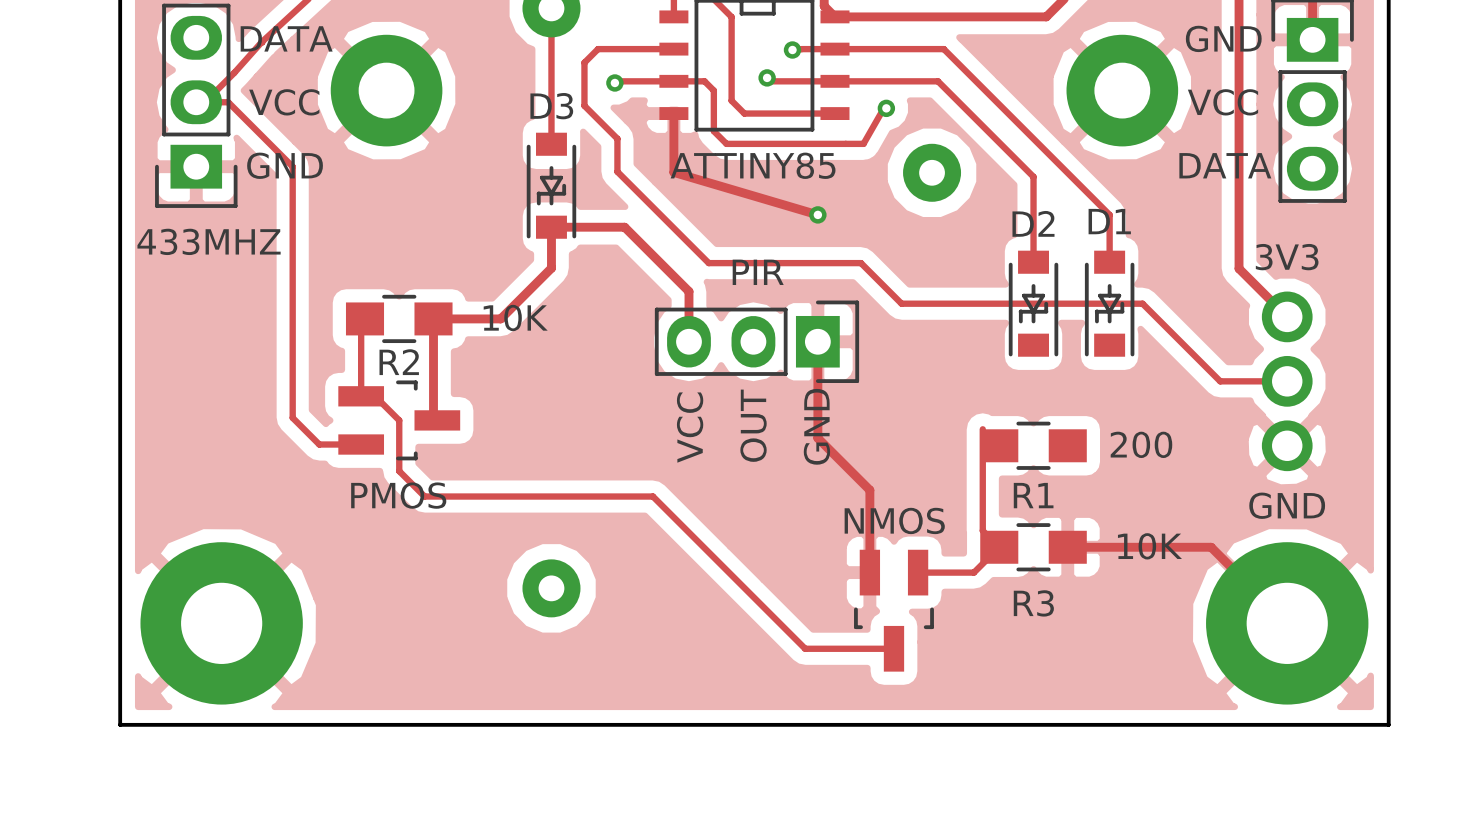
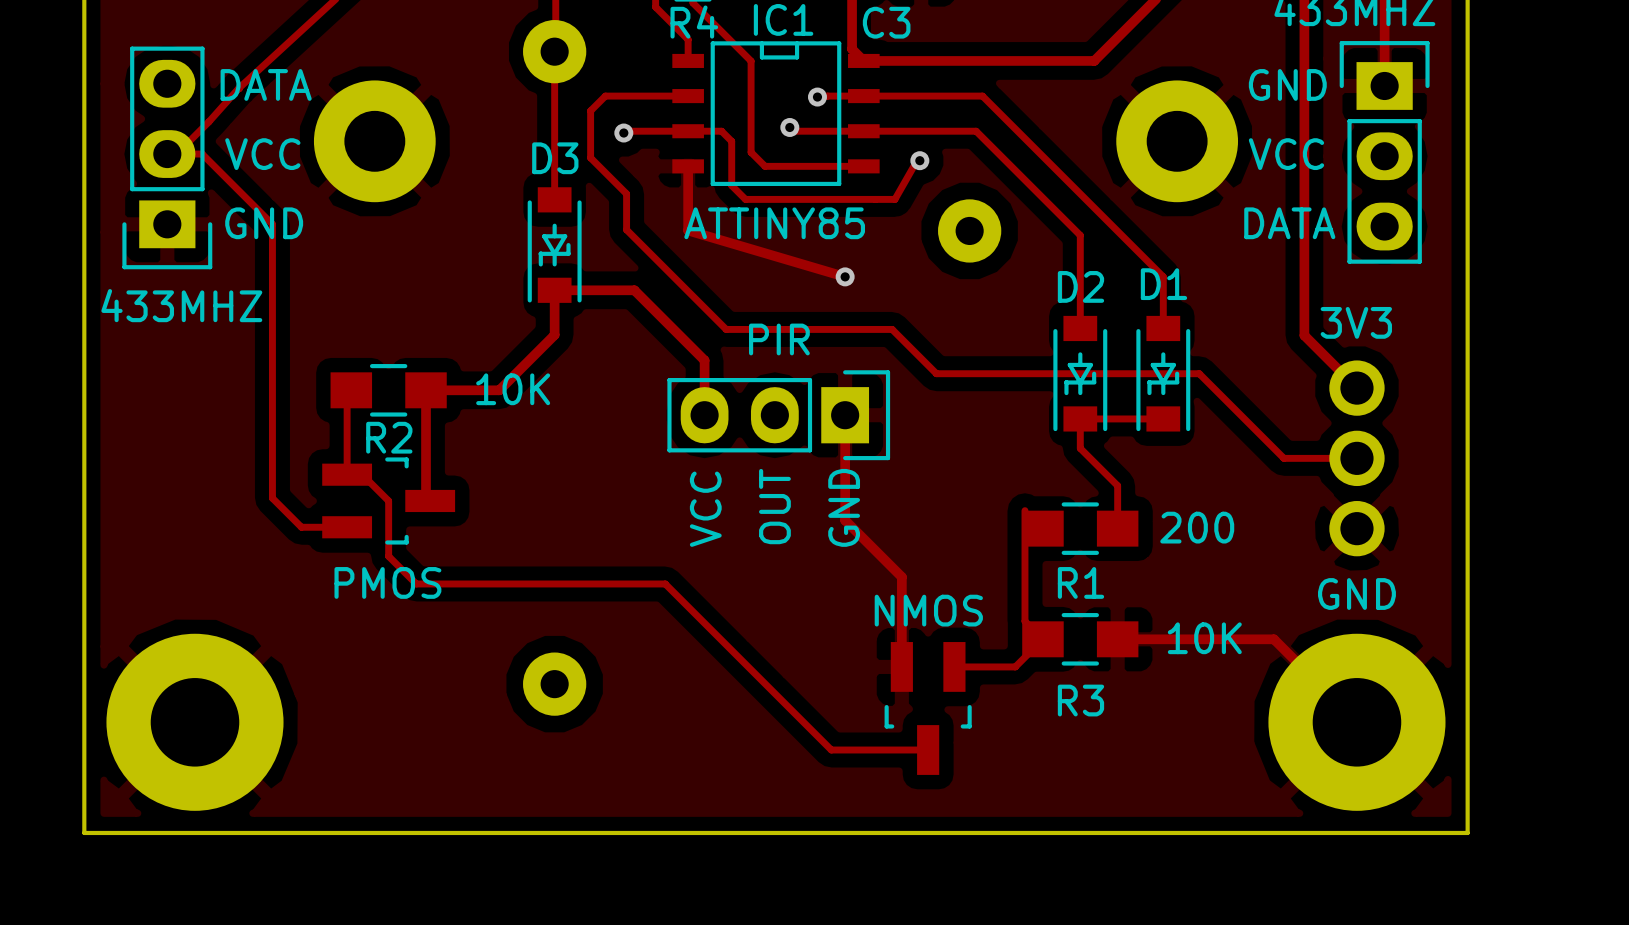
track: none -> (1163, 418) (1080, 418) (1080, 448) (1117, 485) (1117, 528)

